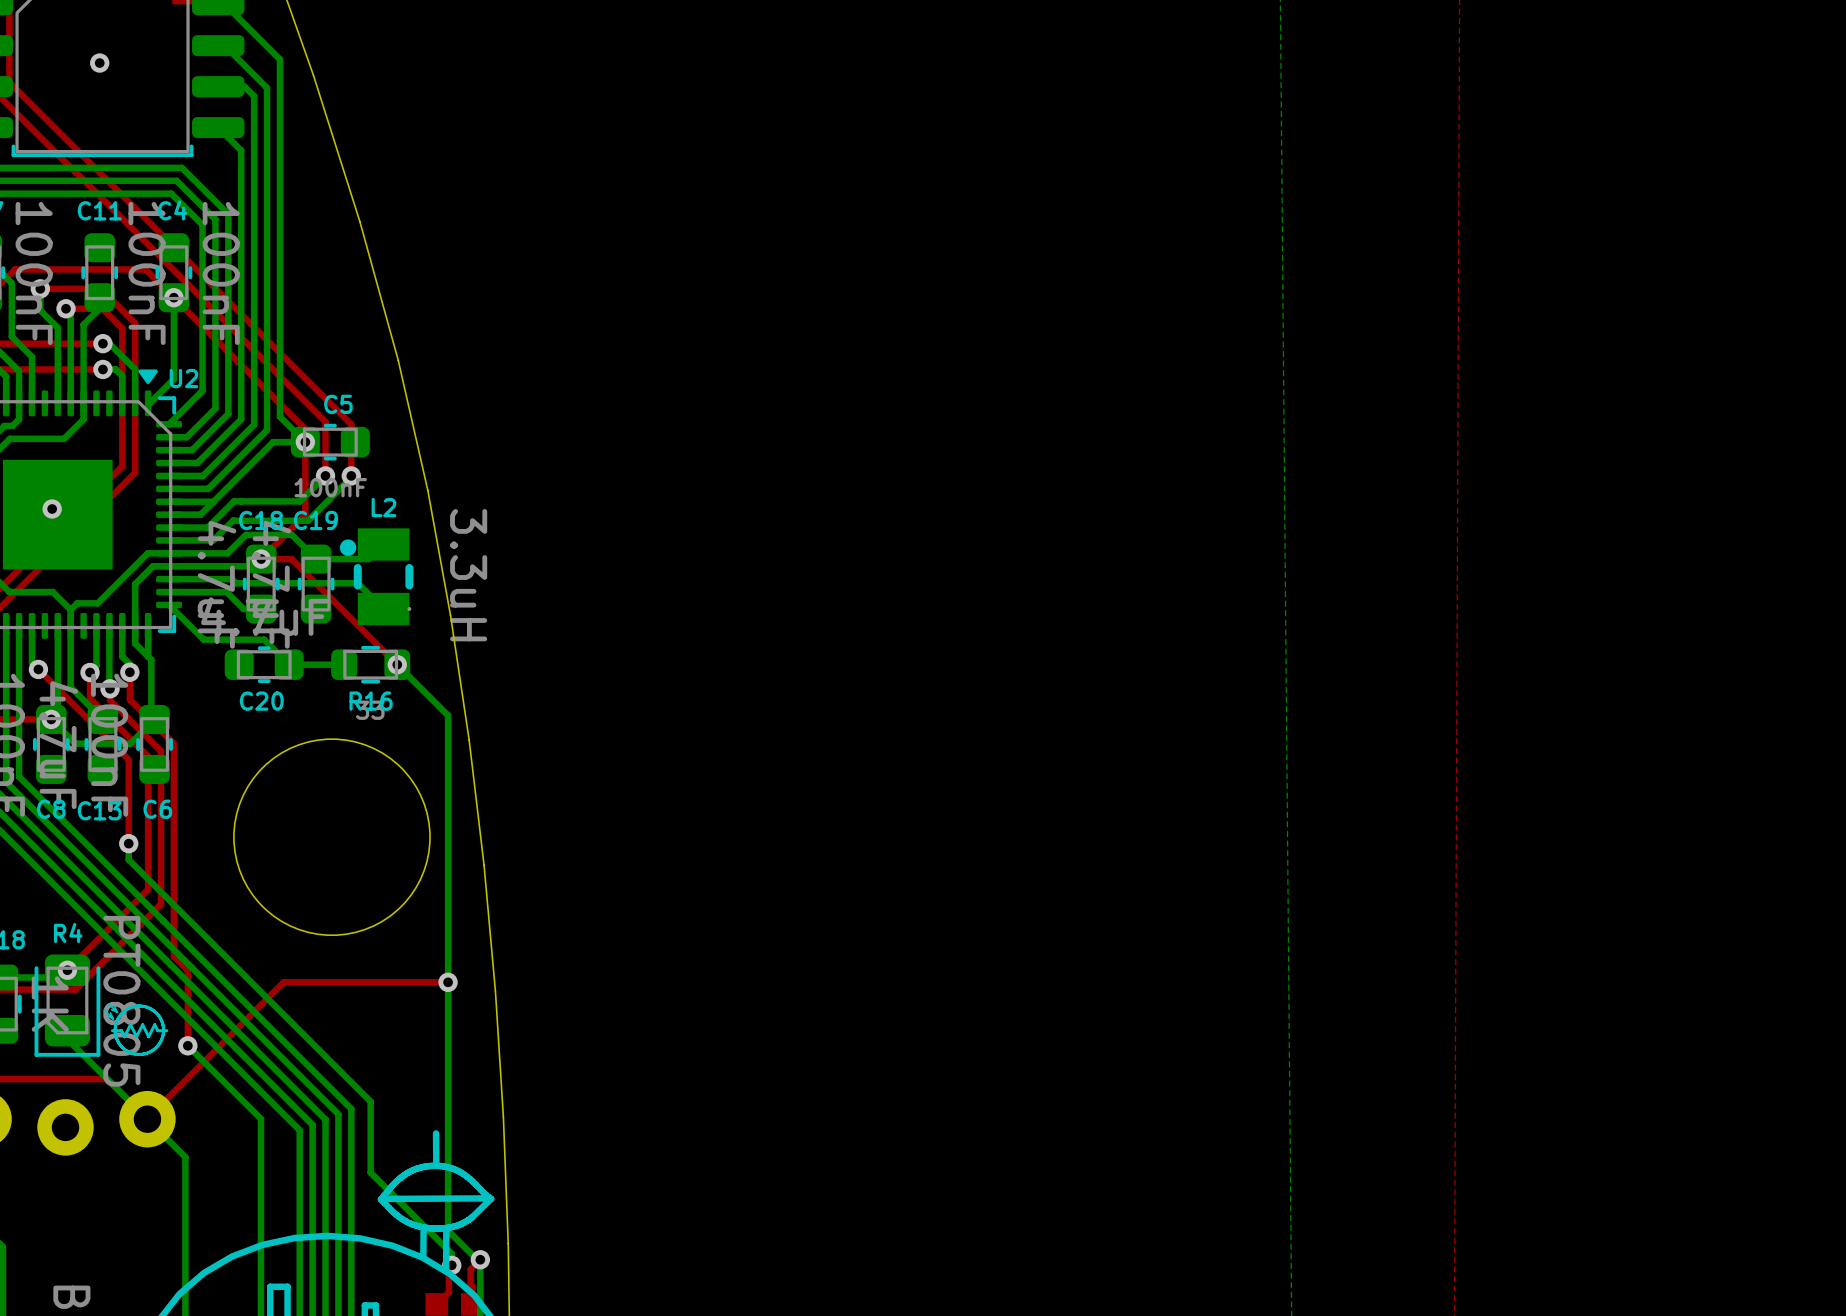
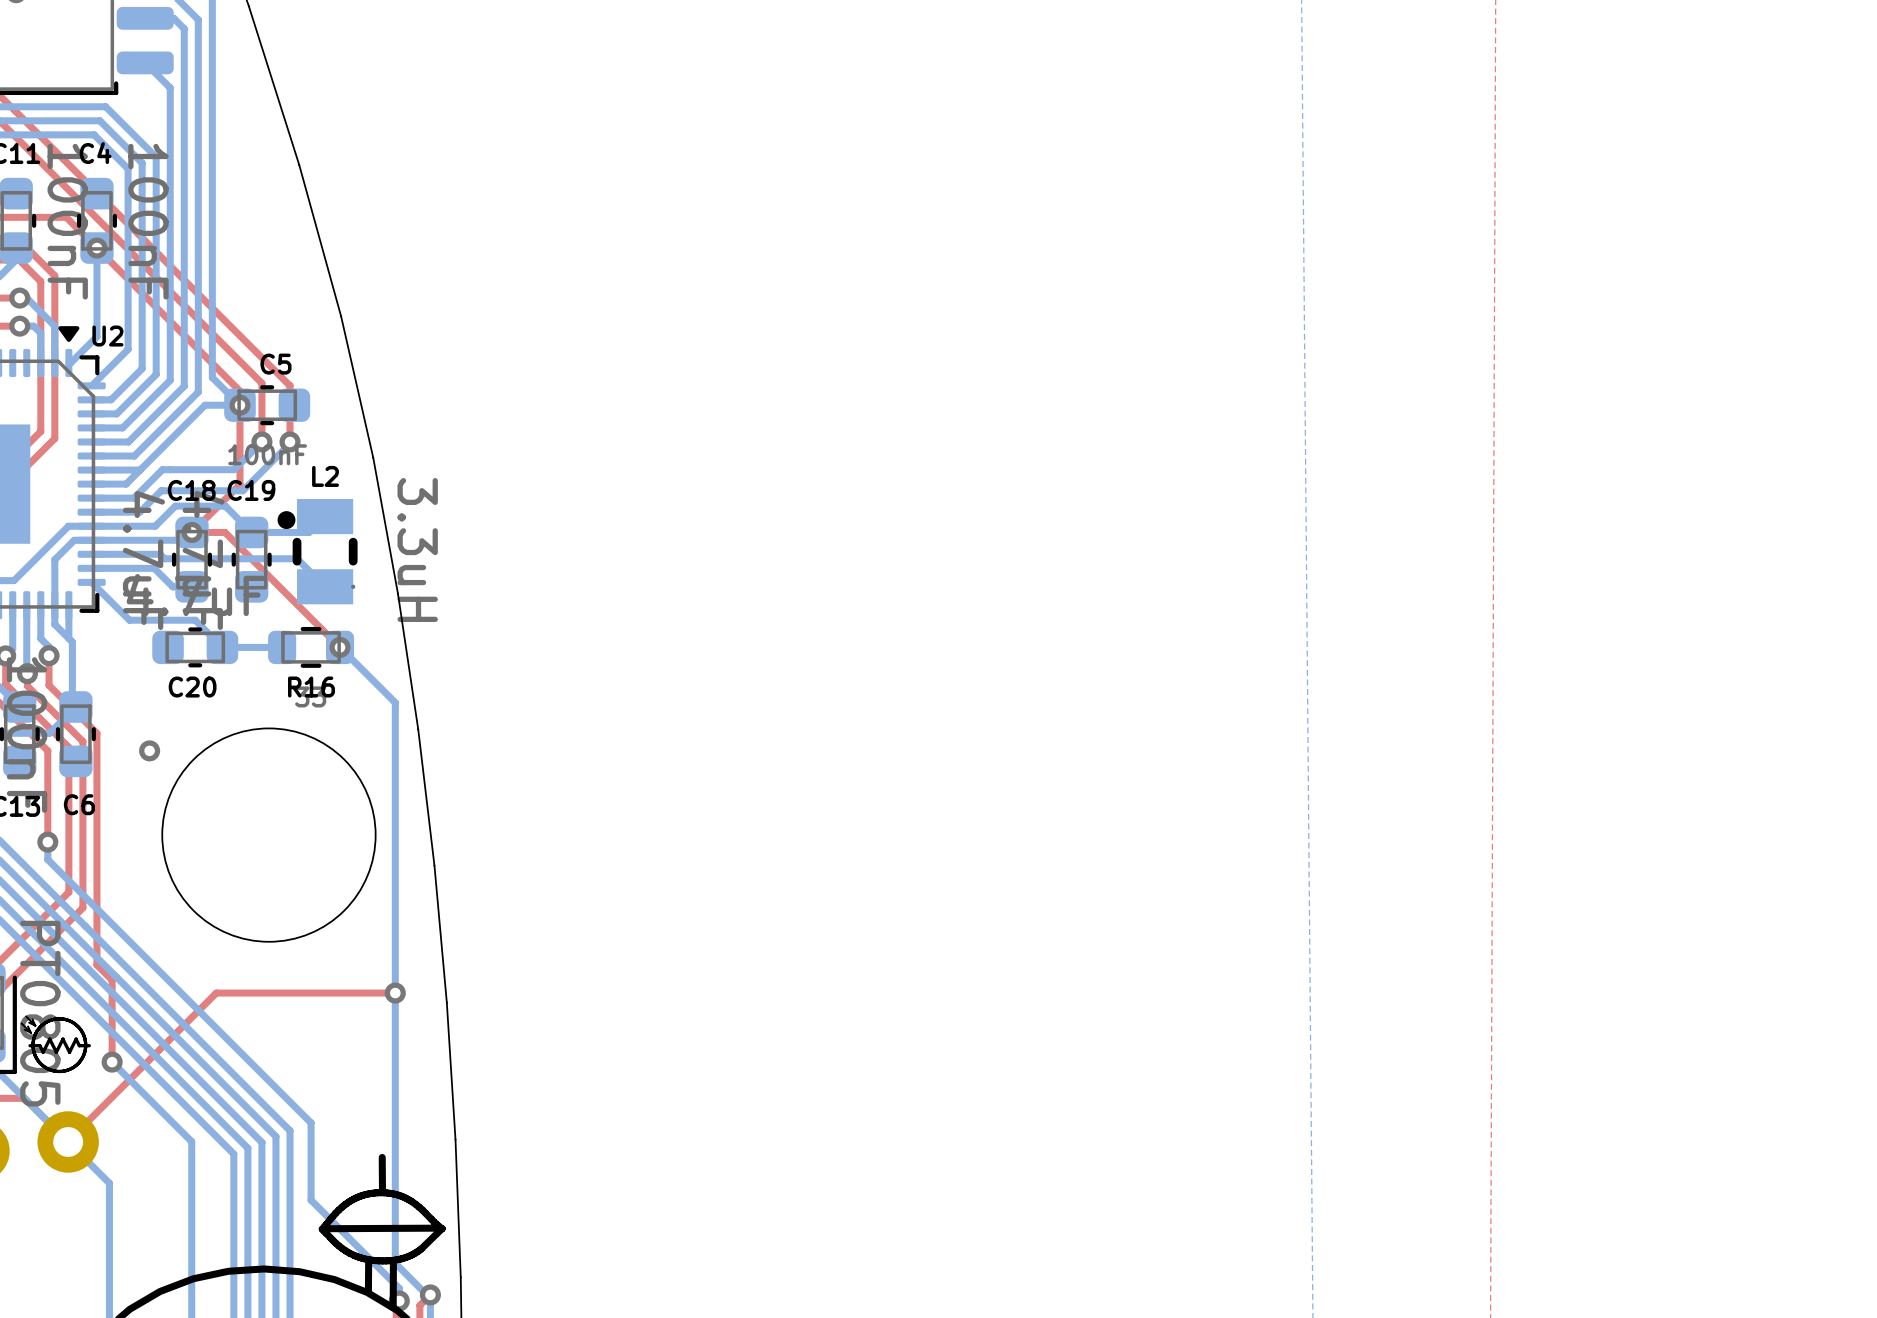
via: none -> (149, 750)

